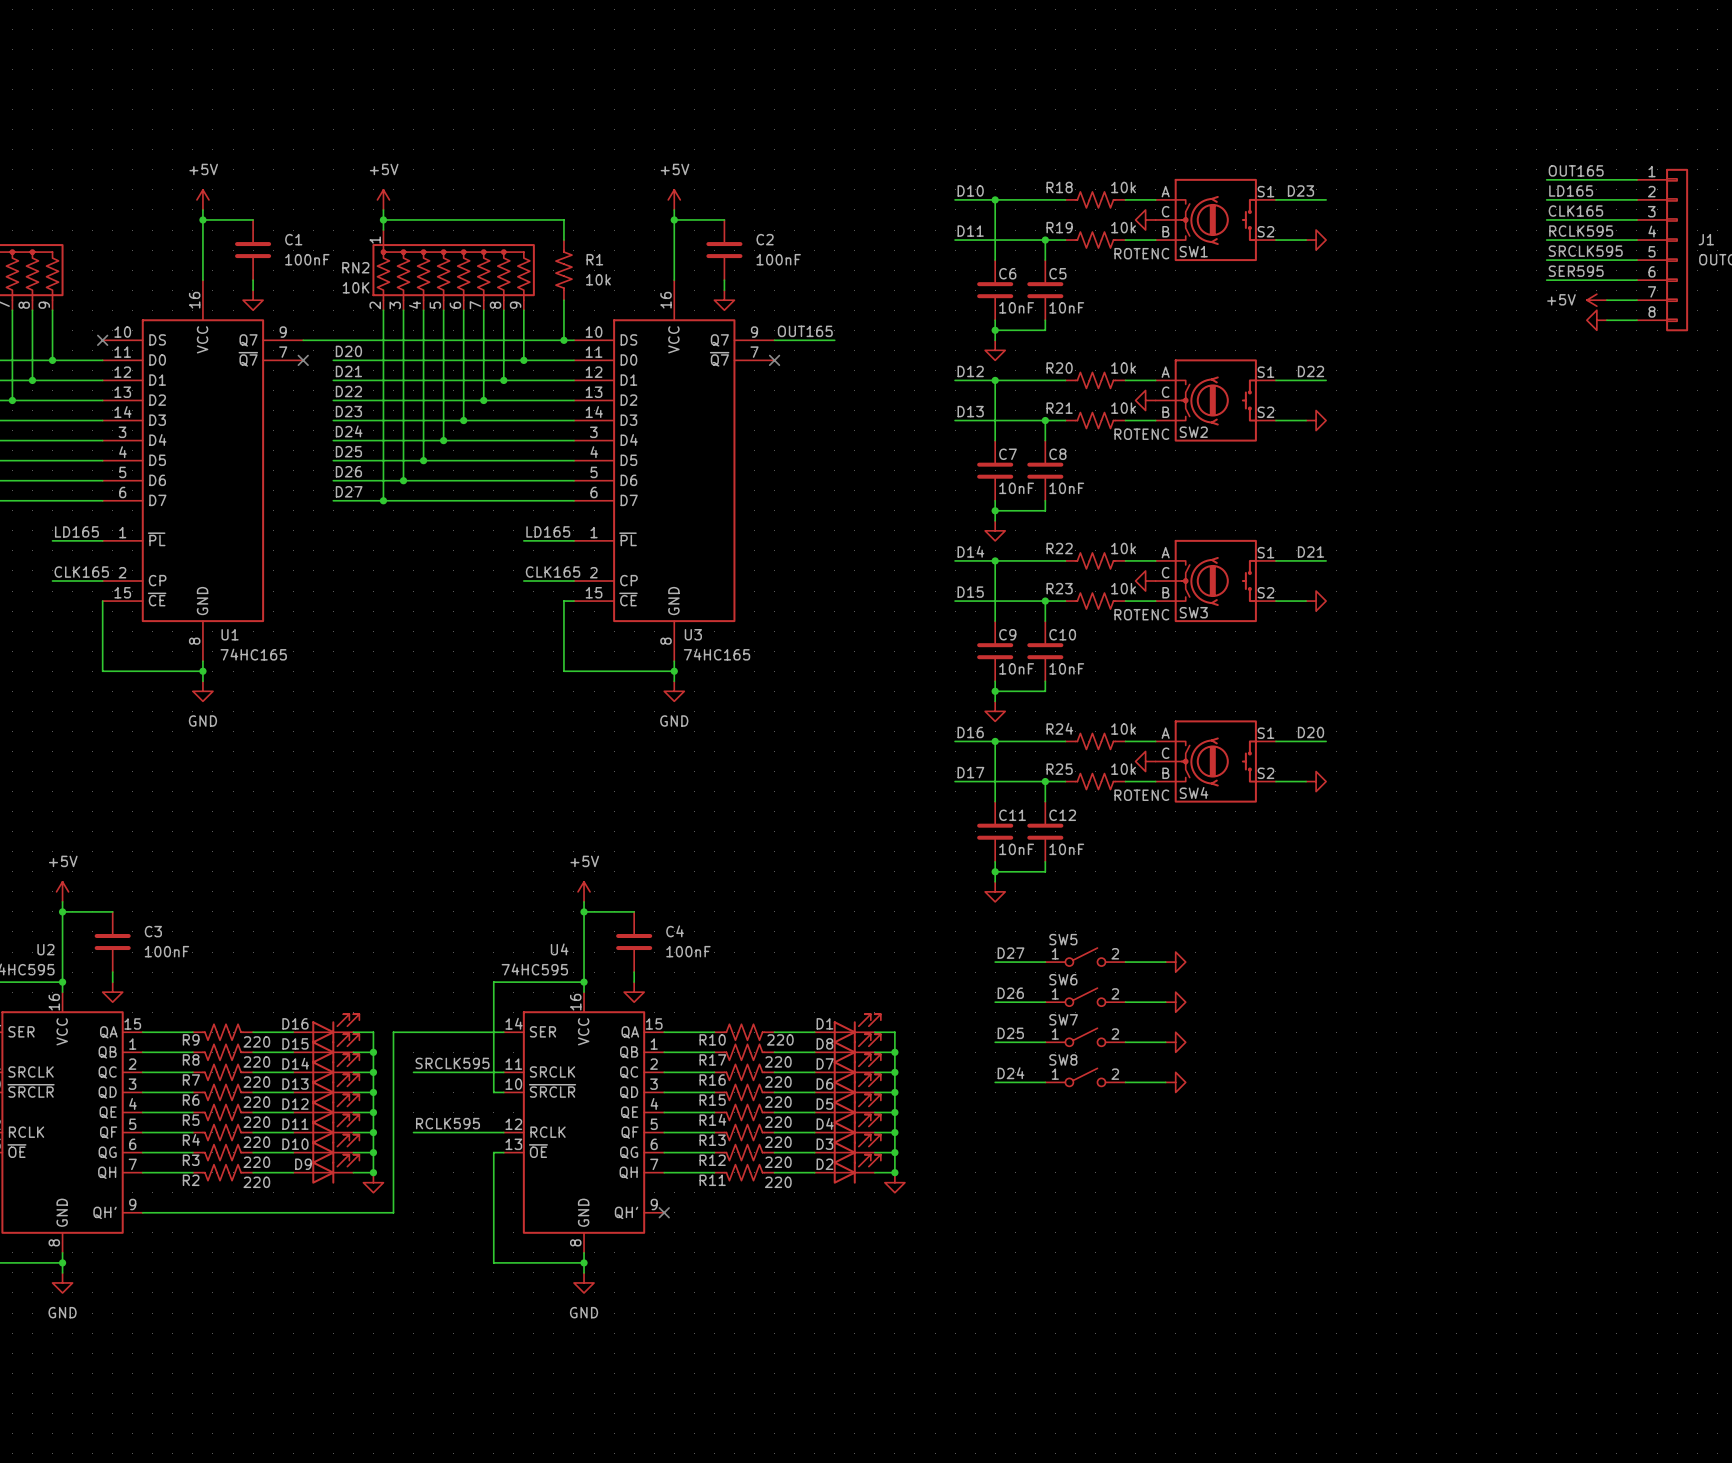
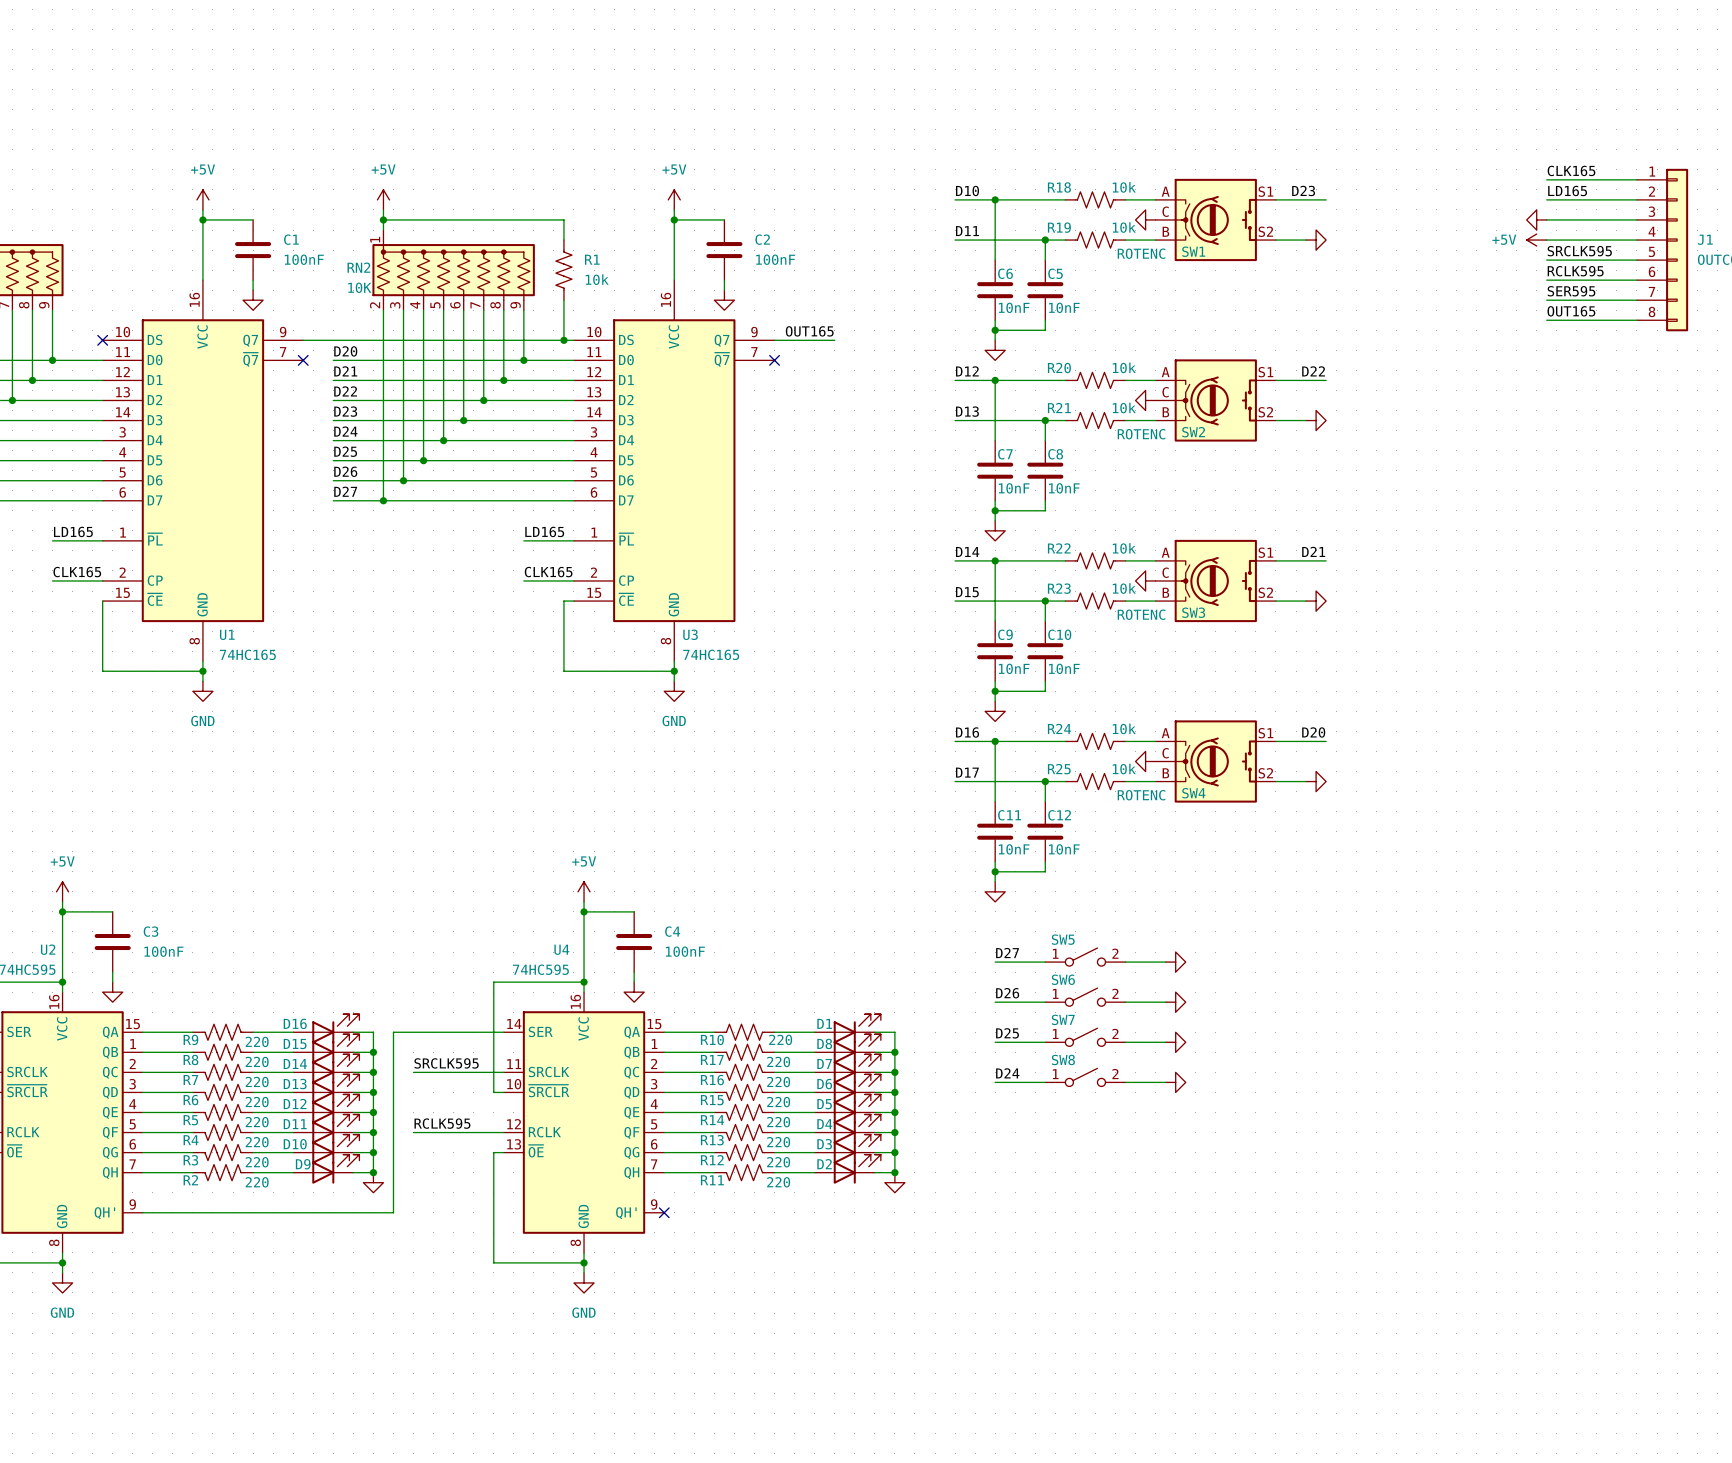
label: OUT165 (1576, 170) -> CLK165 (1571, 170)
label: CLK165 (1575, 211) -> none
label: RCLK595 (1581, 231) -> none
label: SER595 (1576, 271) -> RCLK595 (1575, 271)
label: none -> SER595 (1571, 291)
wire: none -> (1546, 300) (1606, 300)
power symbol position: +5V (1596, 300) -> +5V (1536, 240)
label: none -> OUT165 (1571, 311)
wire: none -> (1546, 320) (1606, 320)
power symbol position: (1596, 320) -> (1536, 219)

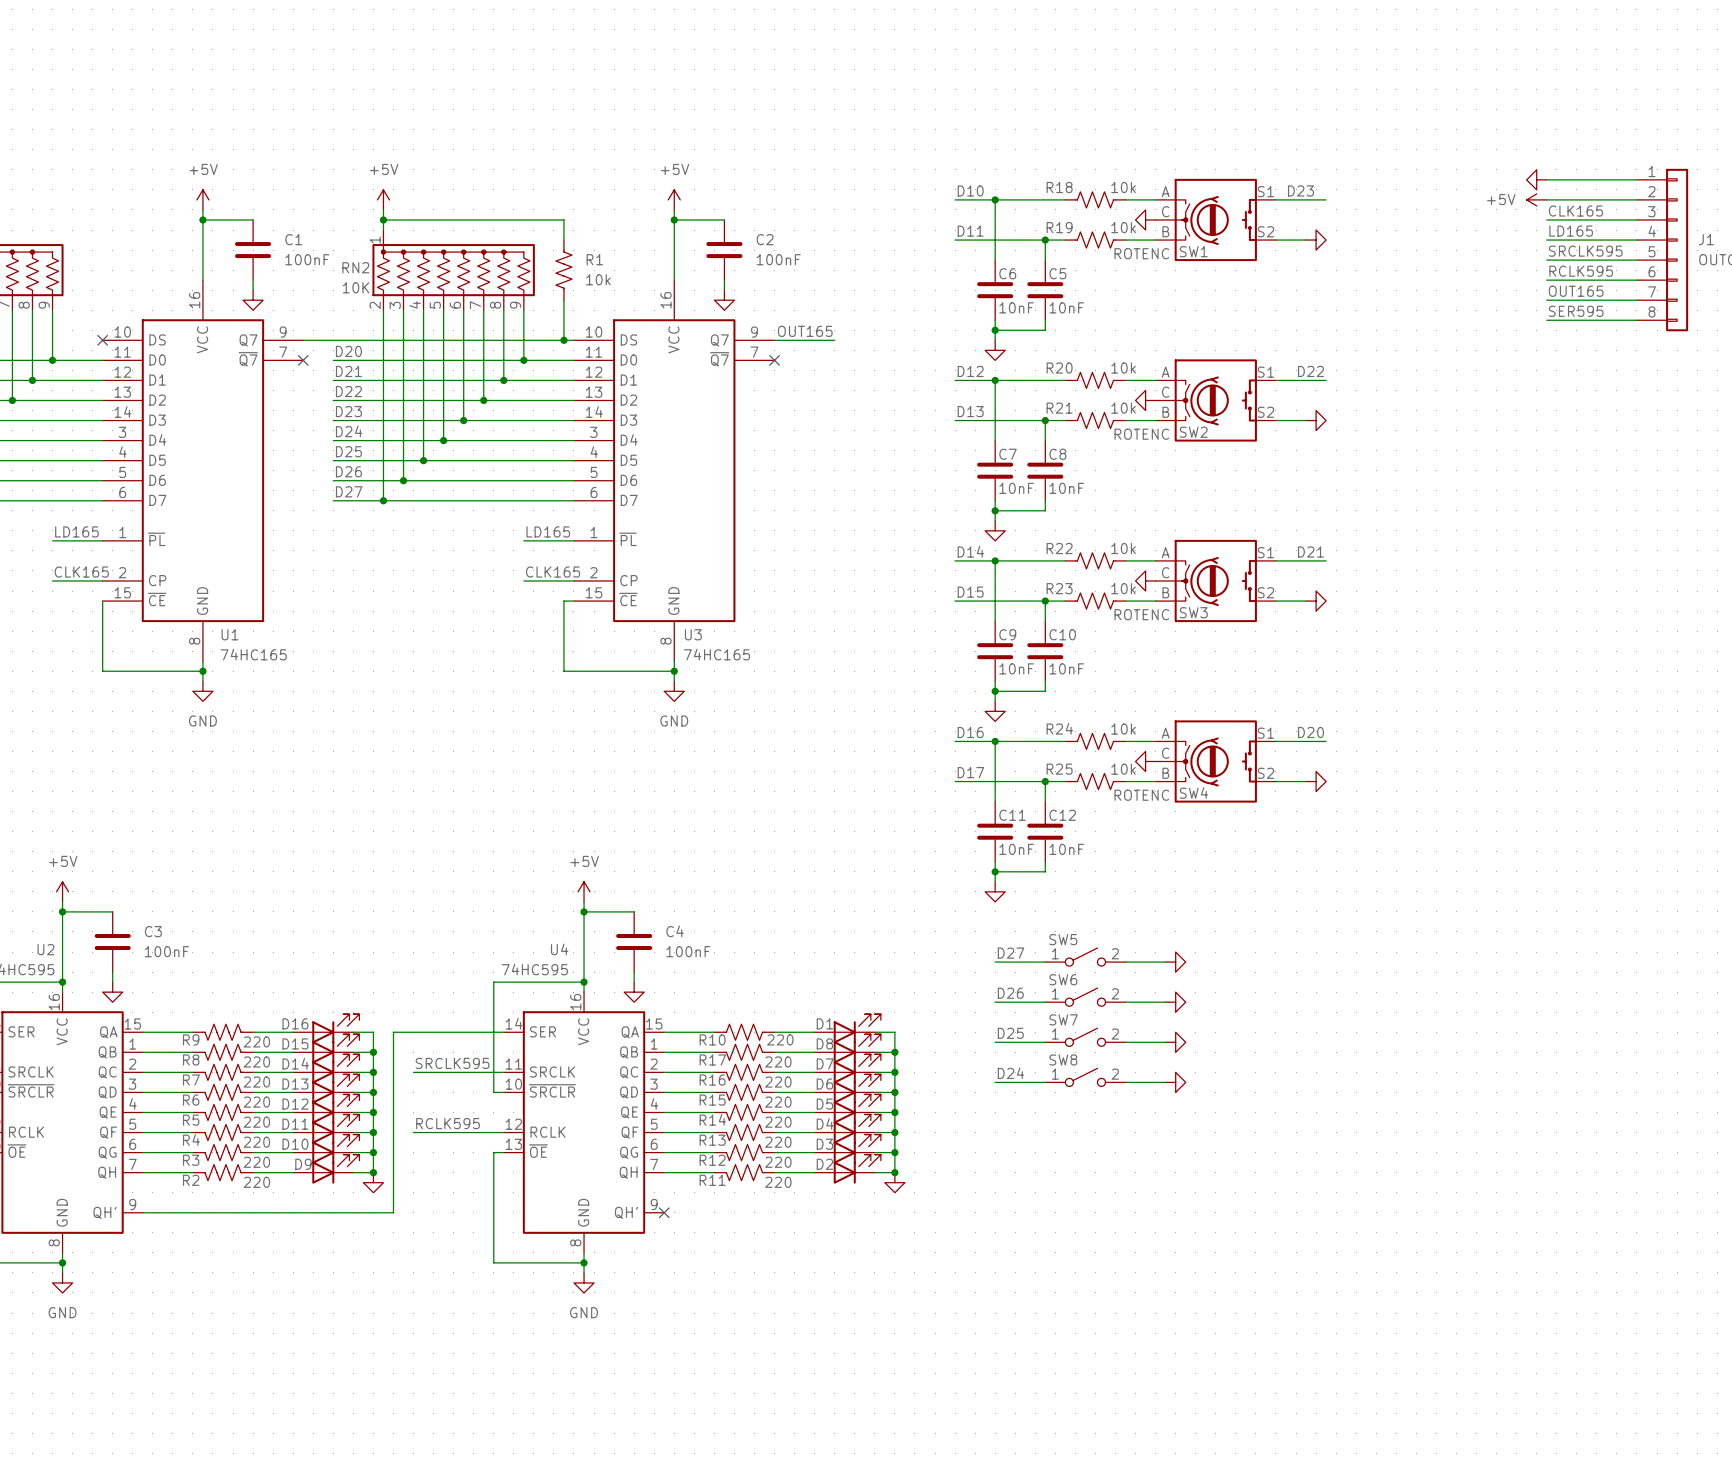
label position: CLK165 (1571, 170) -> CLK165 (1575, 211)
label position: LD165 (1567, 190) -> LD165 (1571, 231)
power symbol position: (1536, 219) -> (1536, 179)
power symbol position: +5V (1536, 240) -> +5V (1536, 199)
label: SER595 (1571, 291) -> OUT165 (1576, 291)
label: OUT165 (1571, 311) -> SER595 (1576, 311)

